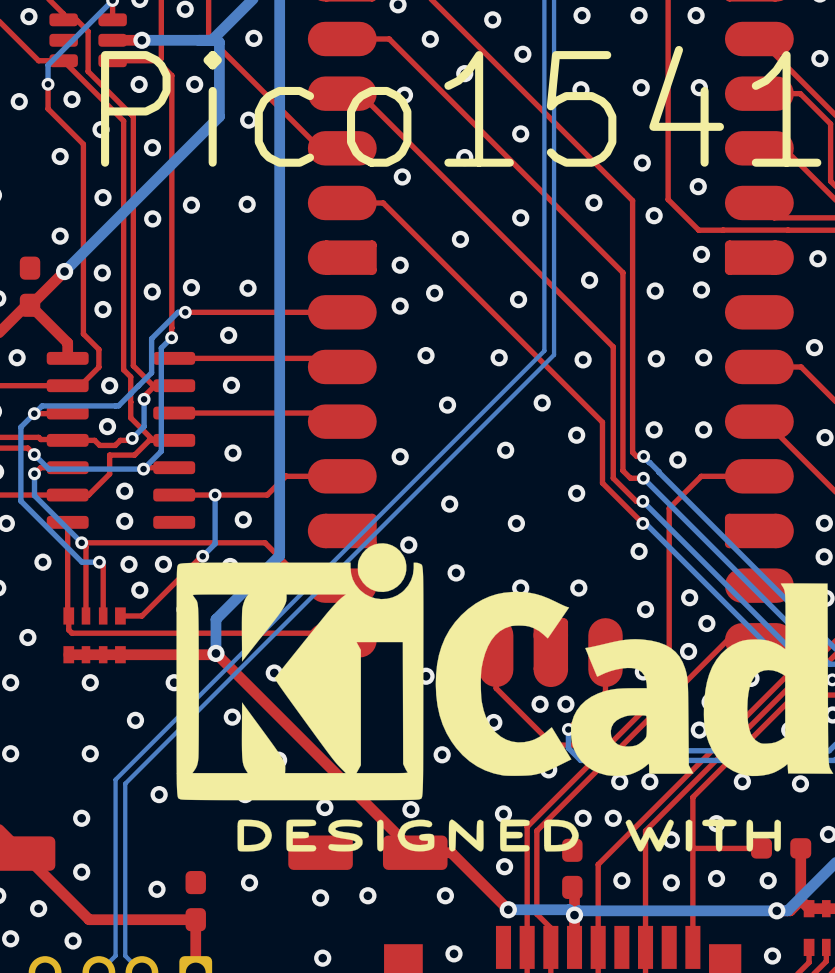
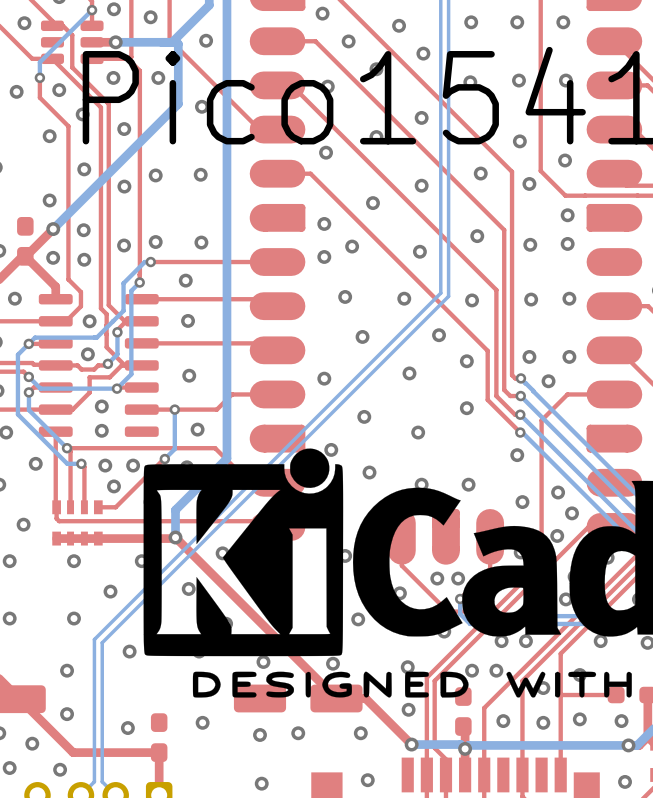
via: none -> (53, 257)

